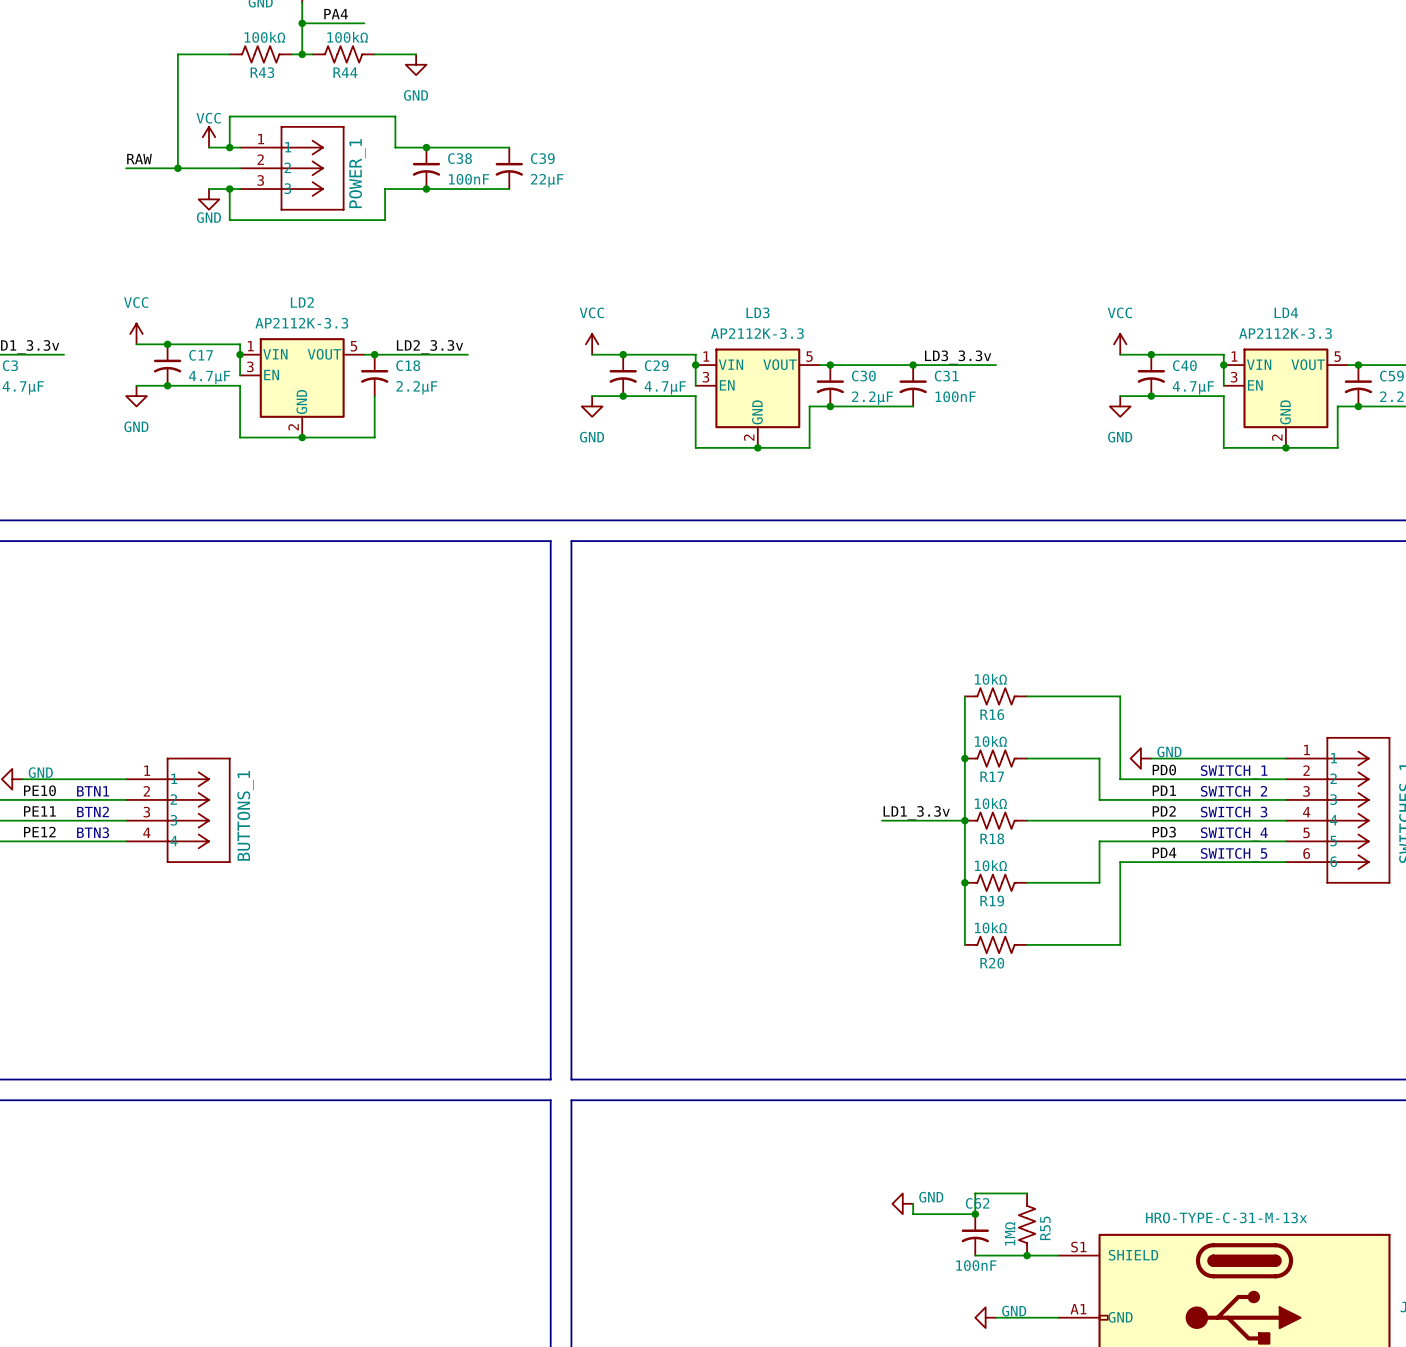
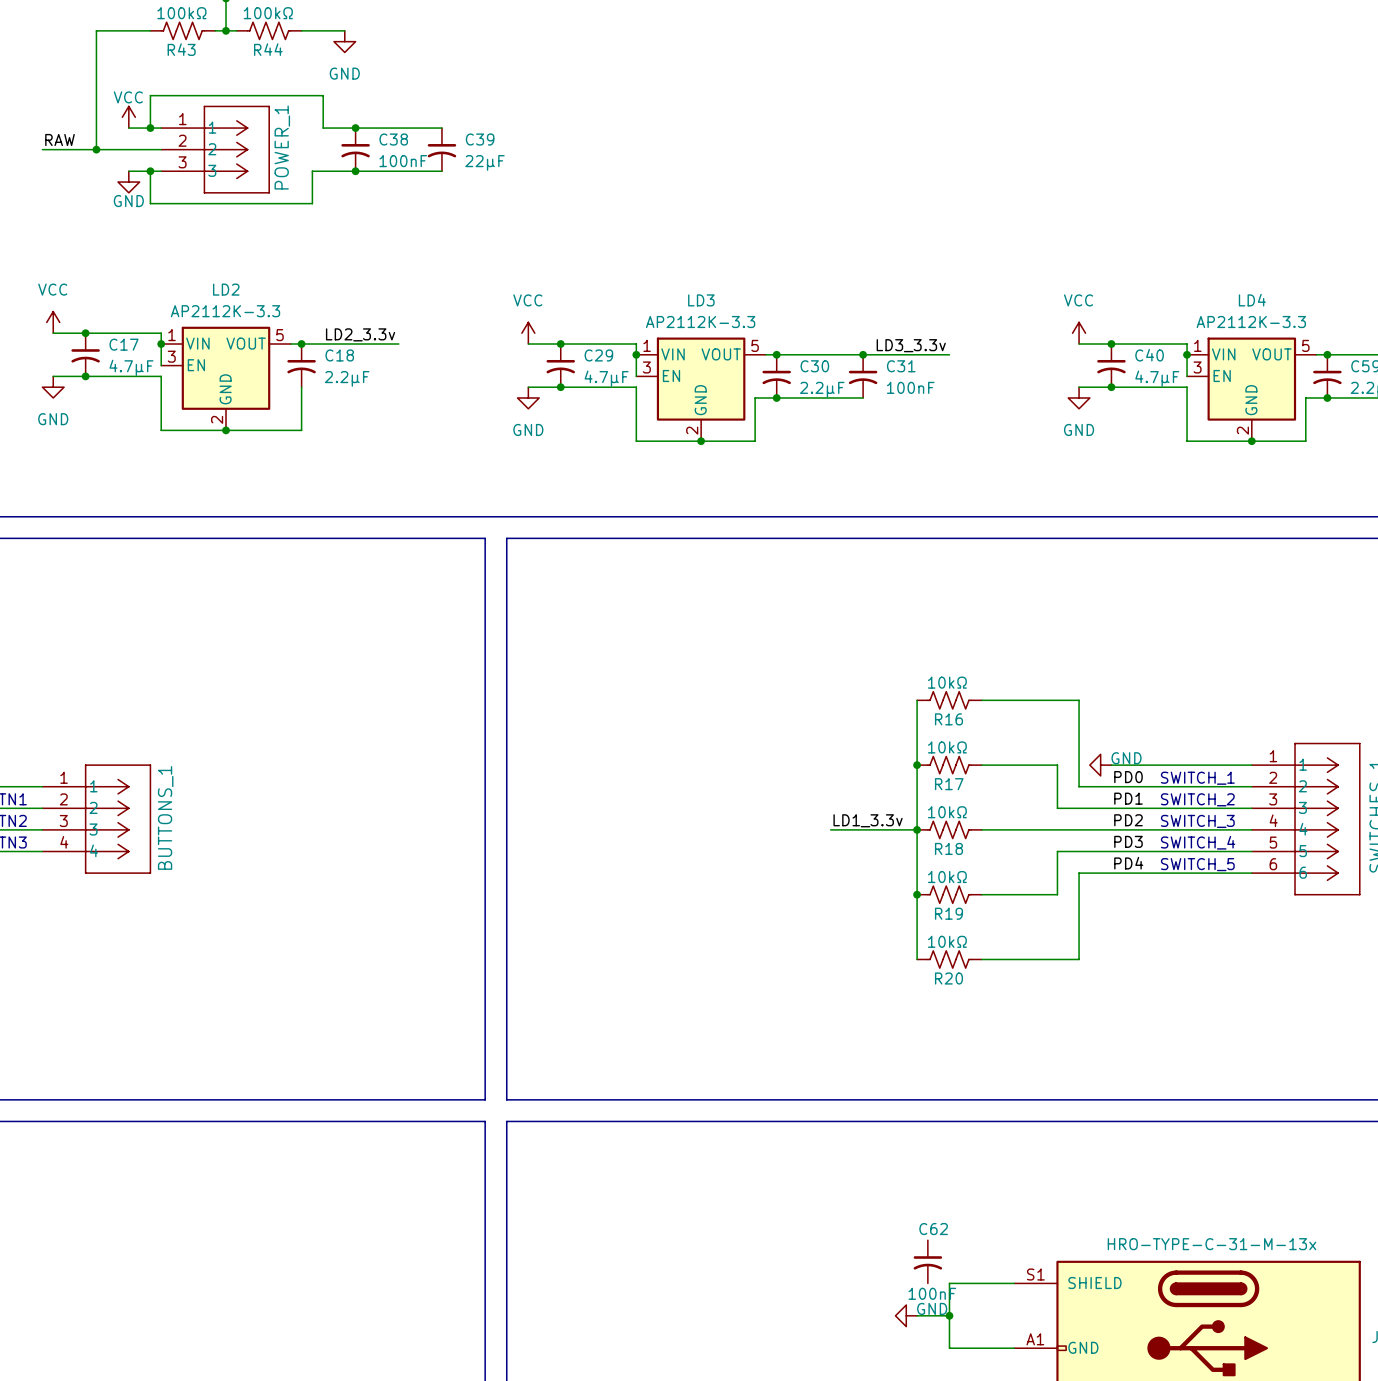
wire: (1027, 1193) (975, 1193) (975, 1214) (913, 1214) (913, 1203) -> none
power symbol: GND (902, 1203) -> none
junction: (975, 1214) -> none
R55: 1MΩ (1027, 1224) -> none
wire: (975, 1255) (995, 1255) -> (949, 1348) (949, 1283)
junction: (1027, 1255) -> none
wire: none -> (917, 1315) (949, 1315)
junction: none -> (949, 1315)
power symbol position: GND (985, 1317) -> GND (906, 1315)

